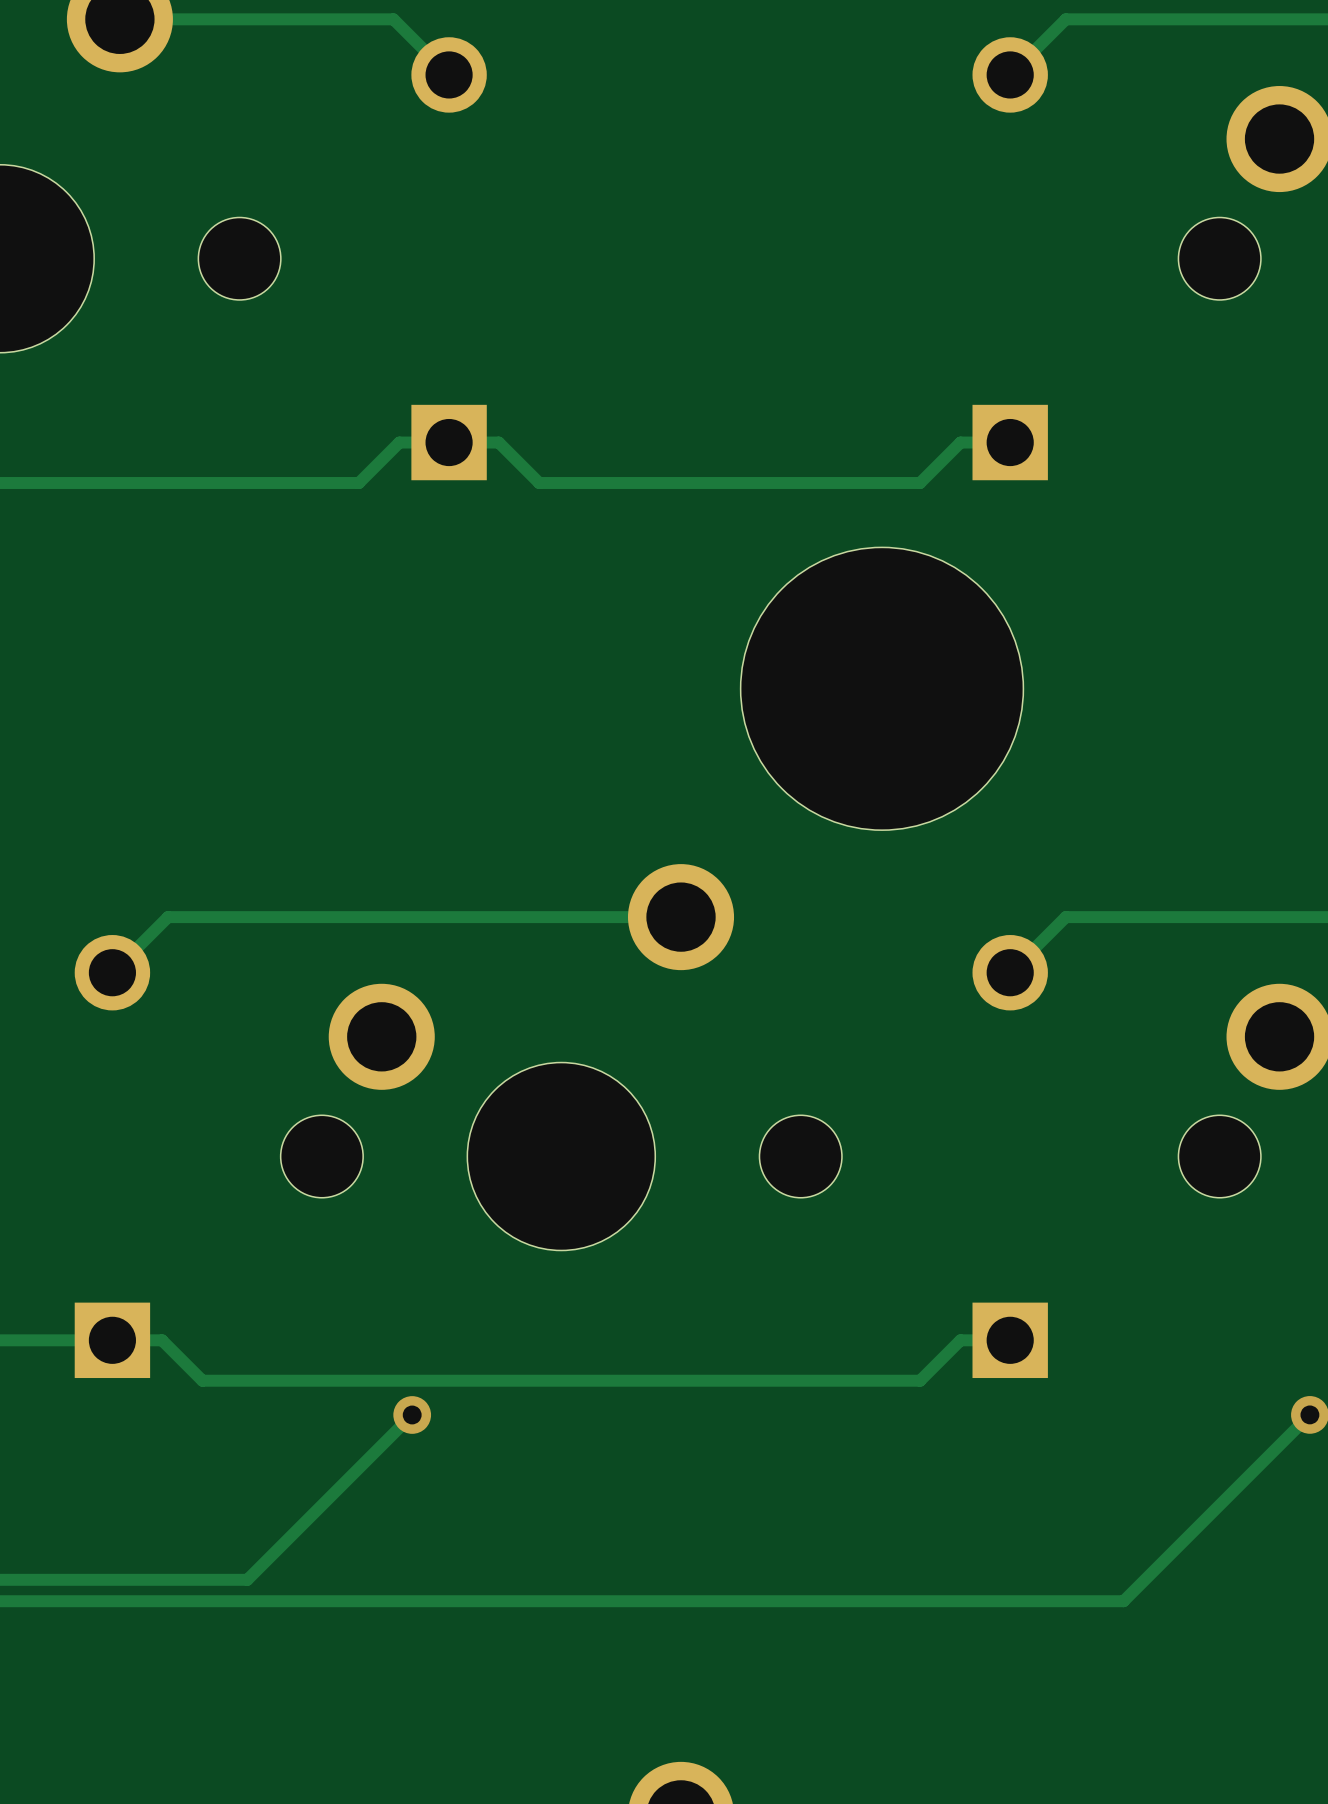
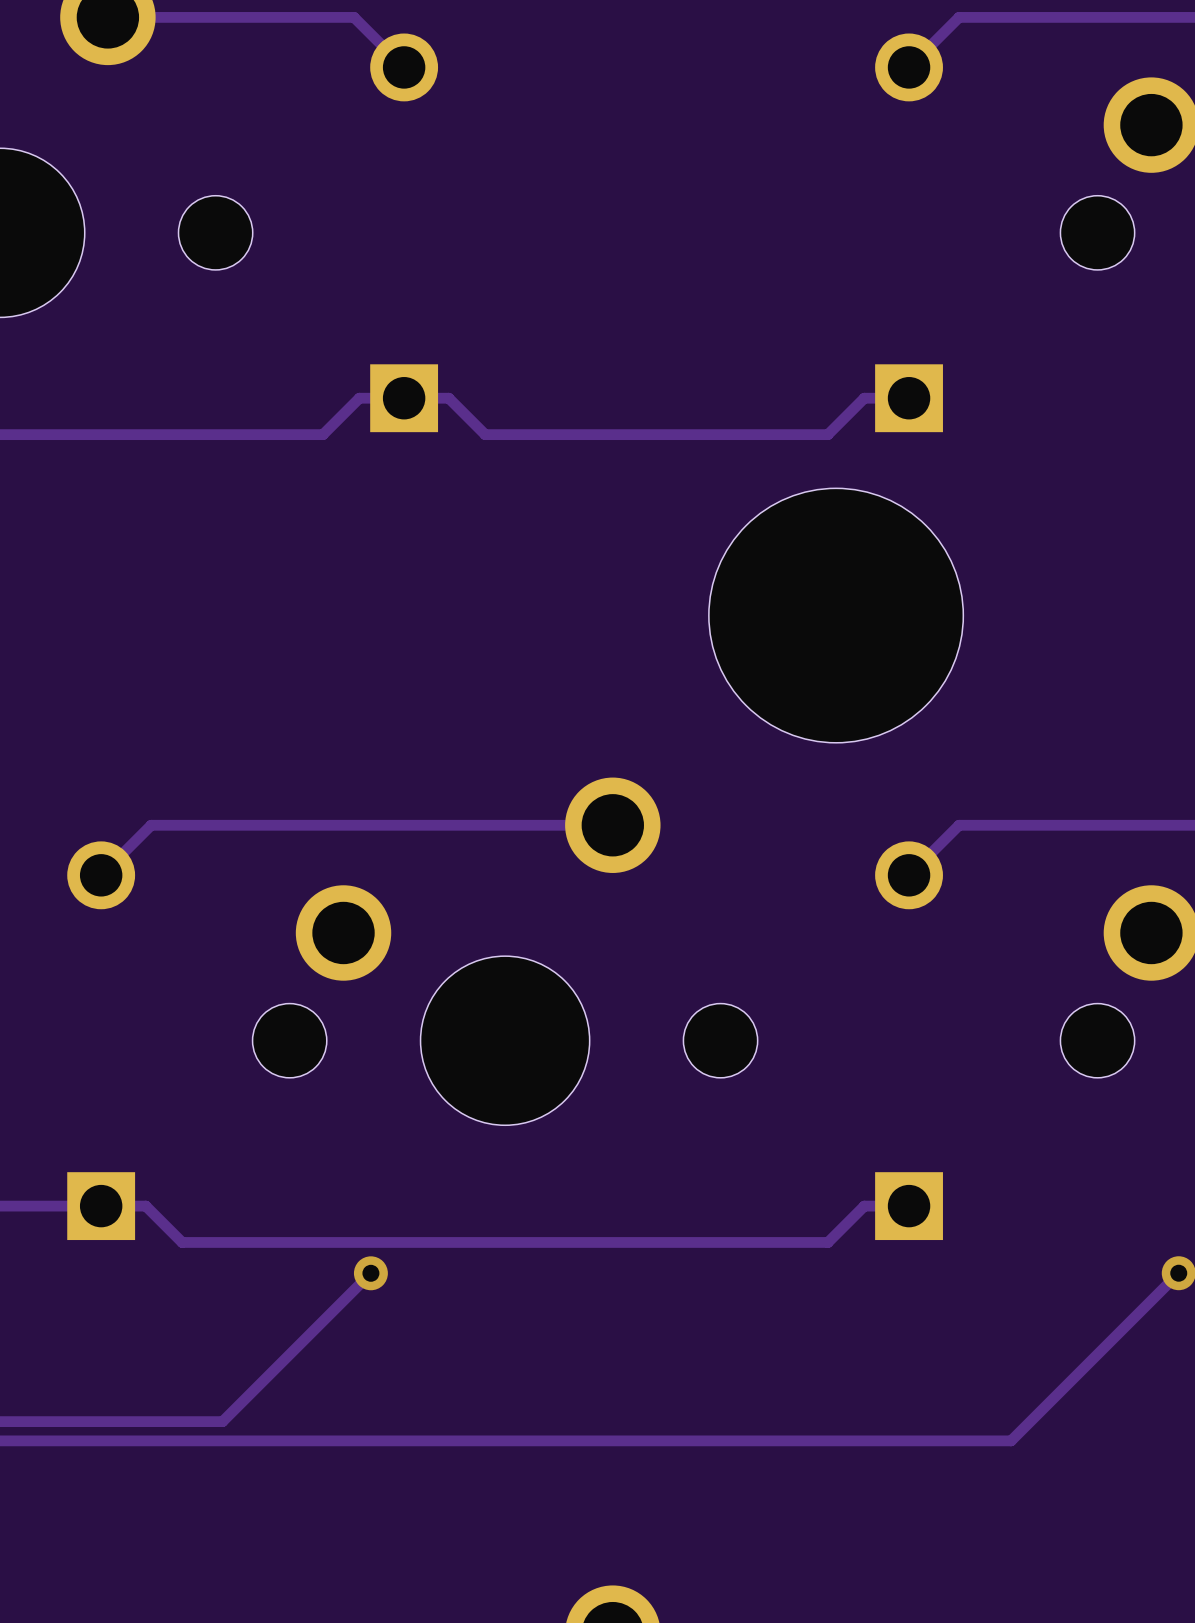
part position: (882, 688) -> (836, 615)

